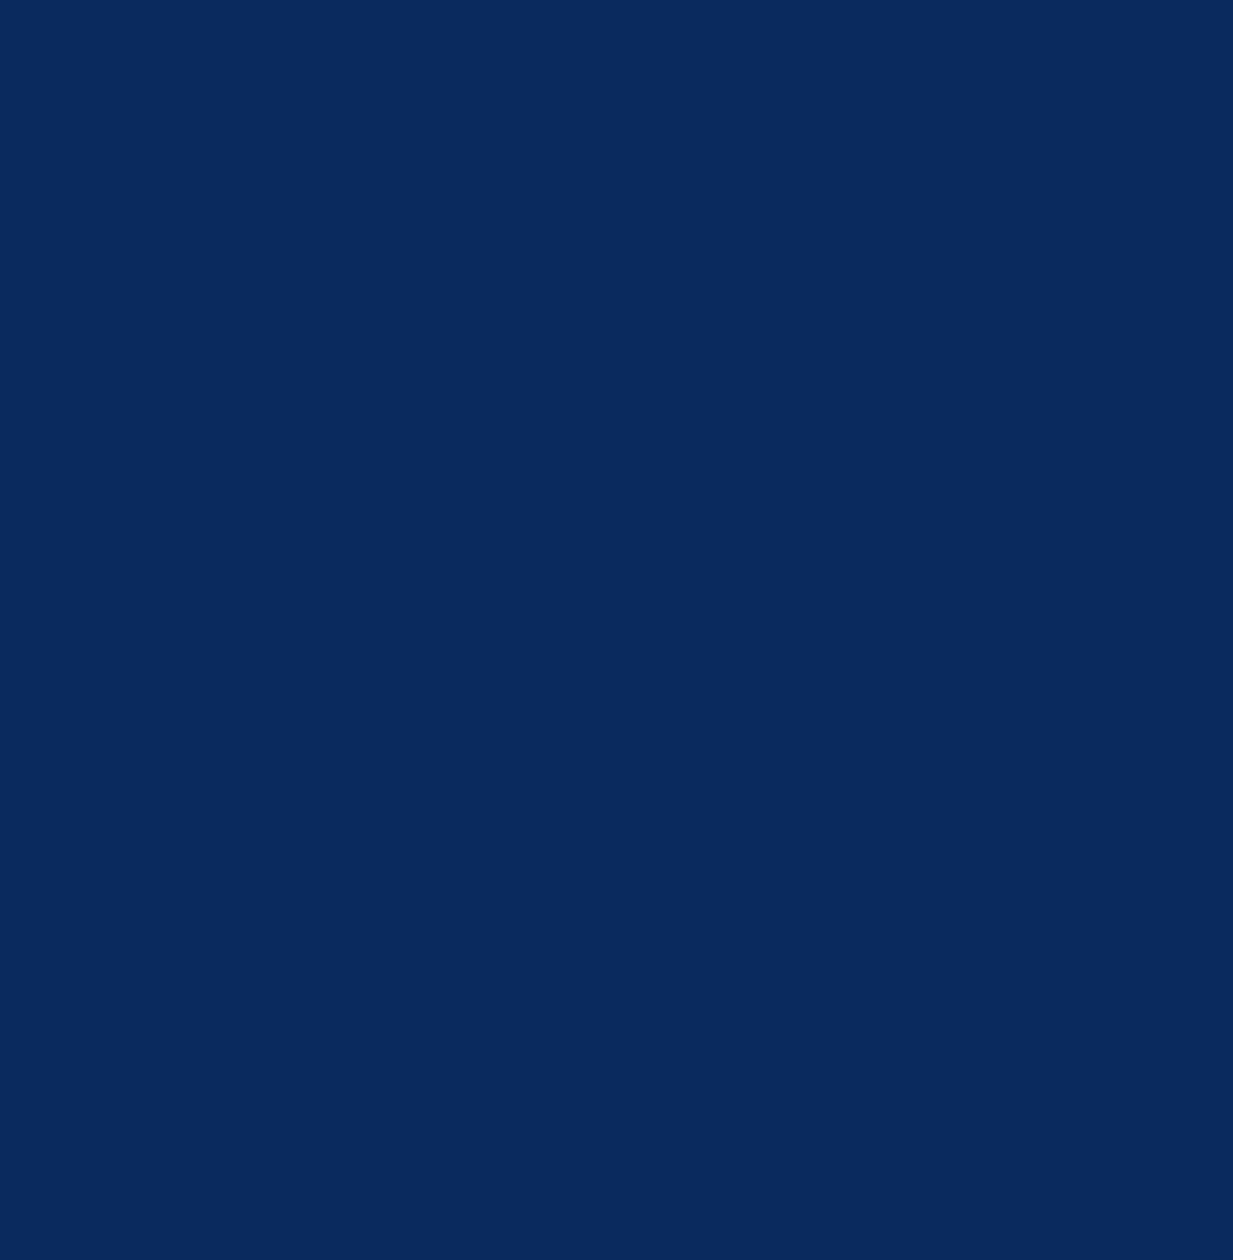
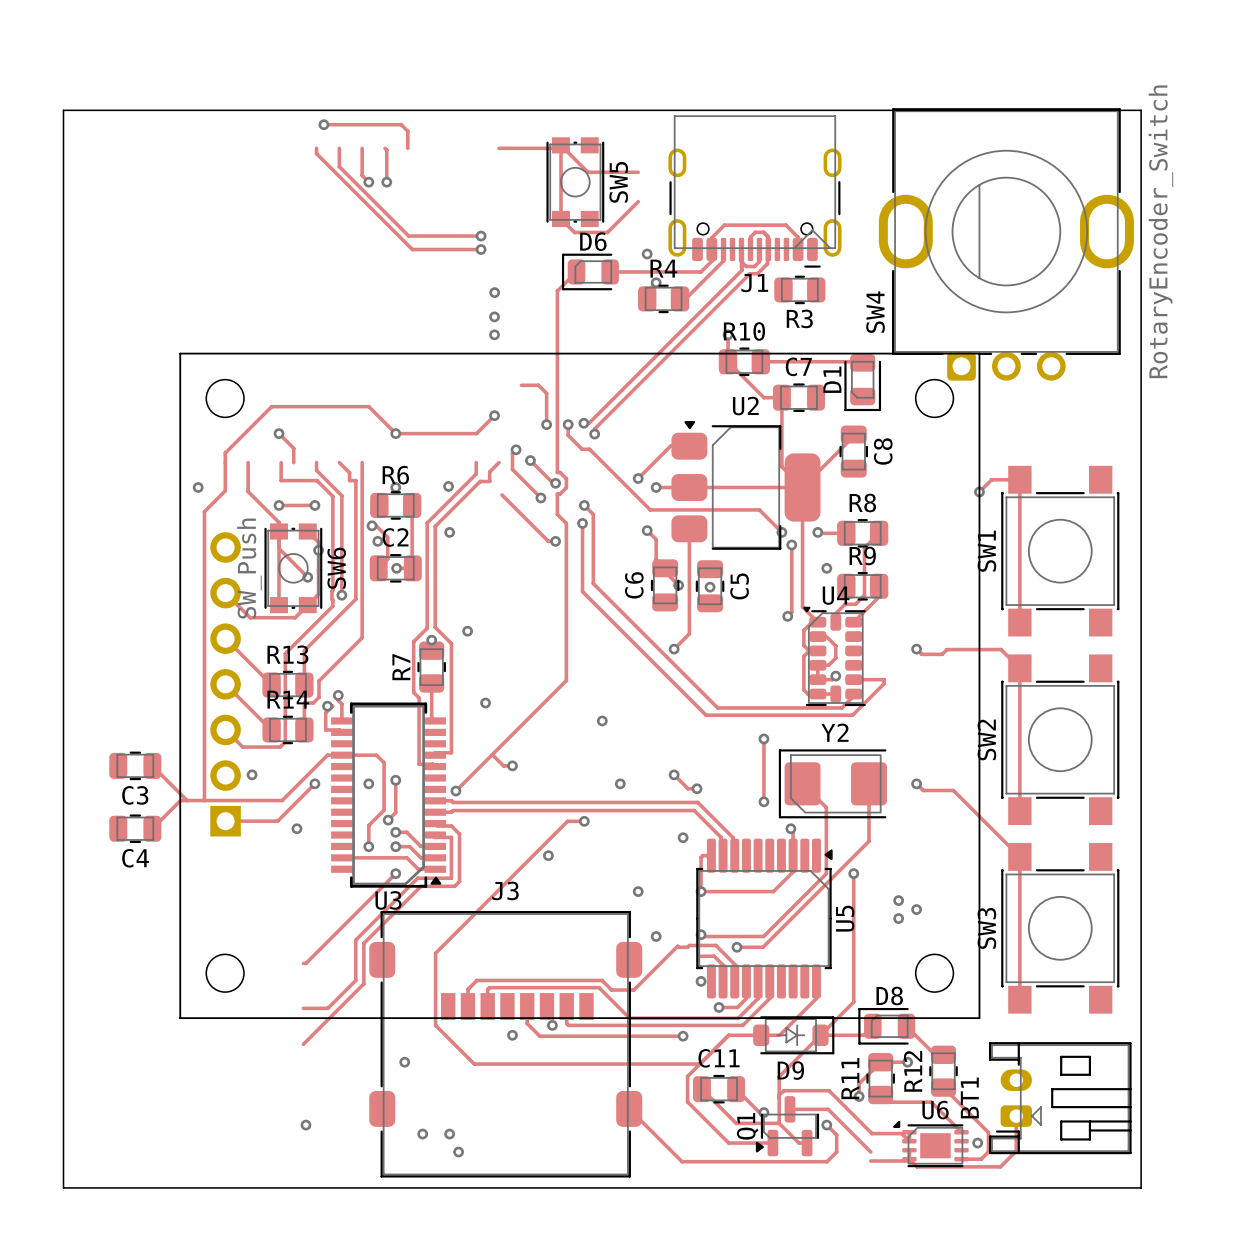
board edge: none -> (63, 110) (1141, 110) (1141, 1187) (63, 1187) (63, 110)
track: none -> (323, 124) (401, 124) (407, 131) (407, 148)
via: none -> (323, 124)
track: none -> (560, 145) (558, 148) (499, 148)
track: none -> (560, 145) (587, 172) (638, 172)
track: none -> (560, 145) (560, 218) (574, 232) (607, 232) (638, 201)
track: none -> (316, 148) (316, 153) (412, 249) (481, 249)
track: none -> (339, 148) (339, 166) (408, 236) (481, 236)
track: none -> (362, 148) (362, 175) (368, 182)
track: none -> (384, 148) (386, 150) (386, 182)
via: none -> (368, 182)
via: none -> (386, 182)
SW5: none -> (575, 182)
J1: none -> (754, 191)
via: none -> (481, 236)
track: none -> (767, 236) (767, 263) (757, 273) (749, 273) (594, 428) (594, 434)
SW4: none -> RotaryEncoder_Switch (1006, 244)
via: none -> (481, 249)
track: none -> (723, 249) (723, 260) (685, 298) (679, 298)
track: none -> (741, 249) (741, 270) (588, 423) (583, 423)
track: none -> (750, 249) (750, 237) (755, 232) (763, 232) (768, 237) (768, 249)
track: none -> (759, 249) (759, 261) (754, 266) (746, 266) (741, 261)
track: none -> (798, 249) (798, 237) (785, 225) (724, 225) (711, 237) (711, 261) (700, 271) (610, 271)
via: none -> (647, 254)
track: none -> (576, 271) (557, 291) (557, 472) (560, 472) (566, 478) (566, 487) (560, 494) (557, 494) (557, 514) (566, 523) (566, 680) (455, 791)
D6: none -> (590, 271)
via: none -> (656, 282)
R3: none -> (799, 289)
via: none -> (494, 292)
R4: none -> (663, 298)
via: none -> (494, 316)
via: none -> (494, 334)
track: none -> (728, 334) (728, 361) (763, 397) (781, 397) (781, 466) (802, 487)
via: none -> (728, 334)
R10: none -> (744, 361)
track: none -> (760, 361) (862, 362)
D1: none -> (862, 382)
track: none -> (521, 385) (538, 385) (546, 393) (546, 424)
C7: none -> (798, 397)
track: none -> (494, 415) (476, 433) (395, 433) (368, 406) (271, 406) (225, 453) (225, 490) (204, 511) (204, 800)
via: none -> (494, 415)
via: none -> (583, 423)
via: none -> (546, 424)
track: none -> (568, 424) (568, 435) (582, 449) (589, 449) (650, 509) (759, 509) (781, 532)
via: none -> (568, 424)
track: none -> (279, 433) (293, 448) (293, 462)
via: none -> (279, 433)
via: none -> (395, 433)
via: none -> (594, 434)
track: none -> (853, 434) (802, 487)
track: none -> (689, 446) (670, 446) (638, 478)
track: none -> (516, 449) (512, 453) (512, 469) (540, 497)
via: none -> (516, 449)
C8: none -> (853, 451)
track: none -> (530, 460) (553, 483) (555, 483)
via: none -> (530, 460)
track: none -> (248, 462) (248, 491) (279, 522) (279, 596)
track: none -> (281, 462) (281, 480) (317, 480) (332, 496) (332, 606) (285, 653) (285, 741) (280, 747) (242, 747) (225, 729)
track: none -> (316, 462) (316, 470) (341, 495) (341, 595)
track: none -> (339, 462) (349, 472) (349, 480) (355, 480) (355, 599) (304, 650) (304, 685)
track: none -> (362, 462) (362, 637) (318, 681) (318, 697) (313, 703) (304, 703) (304, 729)
track: none -> (476, 462) (476, 474) (427, 523) (427, 628) (413, 641) (413, 692) (419, 697) (419, 764) (432, 764) (435, 766)
track: none -> (499, 462) (489, 471) (489, 481) (480, 481) (435, 526) (435, 627) (451, 643) (451, 752) (435, 752) (435, 755)
via: none -> (638, 478)
track: none -> (1019, 479) (1019, 622)
track: none -> (1019, 479) (991, 479) (979, 491)
via: none -> (555, 483)
U2: none -> (745, 485)
via: none -> (448, 486)
via: none -> (198, 487)
via: none -> (395, 487)
track: none -> (656, 487) (802, 487)
via: none -> (656, 487)
track: none -> (802, 487) (802, 606) (817, 622) (812, 622) (803, 630) (803, 645) (809, 650)
via: none -> (979, 491)
track: none -> (502, 494) (548, 541) (555, 541)
via: none -> (540, 497)
track: none -> (279, 505) (314, 505)
via: none -> (279, 505)
via: none -> (314, 505)
R6: none -> (395, 505)
track: none -> (412, 505) (412, 568) (396, 568)
track: none -> (584, 505) (593, 514) (593, 583) (717, 707) (841, 707) (853, 694)
via: none -> (584, 505)
track: none -> (582, 523) (582, 591) (706, 715) (852, 715) (884, 683) (884, 679) (853, 679)
via: none -> (582, 523)
track: none -> (372, 525) (376, 525) (387, 537) (387, 559) (378, 568)
via: none -> (372, 525)
track: none -> (689, 528) (689, 633) (674, 649)
track: none -> (647, 530) (656, 539) (656, 559) (678, 585)
via: none -> (647, 530)
track: none -> (307, 531) (318, 542) (318, 594) (295, 617) (250, 617) (225, 593)
via: none -> (449, 532)
via: none -> (781, 532)
track: none -> (817, 532) (846, 533)
via: none -> (817, 532)
R8: none -> (862, 533)
track: none -> (879, 533) (864, 547) (864, 595) (855, 604) (845, 604) (835, 613) (835, 622)
via: none -> (377, 541)
via: none -> (555, 541)
track: none -> (791, 544) (791, 612) (787, 616)
via: none -> (791, 544)
track: none -> (279, 548) (307, 577)
via: none -> (318, 550)
SW1: none -> (1060, 551)
SW6: none -> SW_Push (293, 568)
C2: none -> (395, 568)
via: none -> (396, 568)
via: none -> (826, 568)
via: none -> (307, 577)
C6: none -> (665, 585)
via: none -> (678, 585)
C5: none -> (710, 586)
R9: none -> (862, 586)
track: none -> (879, 586) (879, 596) (853, 622)
via: none -> (710, 587)
via: none -> (341, 595)
via: none -> (787, 616)
via: none -> (467, 631)
track: none -> (826, 636) (835, 645) (835, 658) (828, 665) (817, 665) (817, 679) (832, 679) (835, 676)
track: none -> (225, 638) (271, 684)
via: none -> (431, 640)
via: none -> (674, 649)
track: none -> (916, 649) (921, 654) (942, 654) (946, 649) (1001, 649) (1019, 668) (1019, 811)
via: none -> (916, 649)
track: none -> (809, 650) (803, 656) (803, 690) (807, 694) (835, 694)
U4: none -> (834, 656)
R7: none -> (431, 667)
via: none -> (835, 676)
track: none -> (431, 683) (431, 717) (435, 720)
track: none -> (225, 684) (271, 729)
R13: none -> (287, 685)
part: none -> (579, 685)
track: none -> (338, 695) (338, 700) (341, 704) (341, 720)
via: none -> (338, 695)
via: none -> (485, 703)
track: none -> (327, 706) (332, 706) (325, 713) (325, 729) (339, 729) (341, 732)
via: none -> (327, 706)
via: none -> (602, 720)
R14: none -> (287, 729)
track: none -> (763, 738) (763, 801)
via: none -> (763, 738)
SW2: none -> (1060, 739)
track: none -> (492, 754) (503, 765) (512, 765)
C3: none -> (135, 765)
track: none -> (152, 765) (187, 800)
via: none -> (512, 765)
via: none -> (252, 774)
track: none -> (674, 774) (688, 788) (697, 788)
via: none -> (674, 774)
track: none -> (395, 780) (395, 812) (388, 820)
via: none -> (395, 780)
track: none -> (314, 783) (277, 821) (225, 821)
via: none -> (314, 783)
via: none -> (368, 783)
via: none -> (620, 783)
track: none -> (802, 783) (826, 807) (826, 873) (763, 936) (702, 936) (701, 934)
Y2: none -> (832, 783)
track: none -> (869, 783) (869, 841) (763, 947) (737, 947)
track: none -> (916, 783) (923, 790) (953, 790) (1019, 856) (1019, 999)
via: none -> (916, 783)
via: none -> (697, 788)
via: none -> (455, 791)
U3: none -> (388, 795)
track: none -> (435, 800) (453, 802) (697, 802) (732, 837) (732, 853) (734, 855)
via: none -> (763, 801)
track: none -> (435, 812) (453, 810) (694, 810) (721, 837) (721, 853) (723, 855)
via: none -> (388, 820)
track: none -> (584, 821) (567, 821) (435, 953) (435, 1025) (474, 1064) (699, 1064)
via: none -> (584, 821)
track: none -> (435, 823) (437, 826) (451, 826) (459, 834) (459, 881) (454, 886) (421, 886) (363, 943) (363, 983) (303, 1044)
C4: none -> (135, 828)
track: none -> (152, 828) (180, 800) (282, 800) (327, 755) (376, 755) (384, 762) (384, 810) (368, 825) (368, 846)
via: none -> (296, 828)
track: none -> (790, 828) (793, 830) (793, 871) (773, 891) (701, 891) (701, 857) (711, 855)
via: none -> (790, 828)
track: none -> (395, 832) (406, 832) (420, 846) (435, 846)
via: none -> (395, 832)
track: none -> (435, 835) (435, 837) (451, 837) (451, 878) (417, 878) (355, 940) (355, 980) (327, 1008) (303, 1008)
via: none -> (683, 837)
via: none -> (368, 846)
track: none -> (395, 846) (409, 846) (420, 857) (435, 857)
via: none -> (395, 846)
via: none -> (548, 855)
track: none -> (341, 857) (406, 857) (418, 869) (435, 869)
track: none -> (395, 873) (305, 963) (303, 963)
via: none -> (395, 873)
track: none -> (853, 873) (853, 1002) (779, 1076) (779, 1123)
via: none -> (853, 873)
via: none -> (638, 891)
via: none -> (701, 891)
via: none -> (898, 900)
via: none -> (916, 909)
U5: none -> (764, 918)
via: none -> (898, 918)
SW3: none -> (1060, 928)
via: none -> (701, 934)
via: none -> (656, 936)
via: none -> (737, 947)
track: none -> (701, 956) (714, 956) (723, 965) (723, 981)
via: none -> (701, 981)
track: none -> (734, 981) (734, 964) (715, 945) (677, 946) (633, 990) (611, 990) (602, 980) (476, 980) (467, 989) (467, 1006)
track: none -> (746, 981) (746, 998) (737, 1007) (719, 1007)
track: none -> (758, 981) (758, 998) (738, 1018) (629, 1018) (599, 987) (489, 987) (487, 989) (487, 1006)
track: none -> (769, 981) (769, 998) (742, 1025) (568, 1025) (566, 1023) (566, 1006)
track: none -> (816, 981) (816, 998) (779, 1035) (728, 1035) (687, 1076) (687, 1101) (728, 1143) (772, 1143)
track: none -> (527, 1006) (527, 1023) (539, 1036) (683, 1036)
via: none -> (719, 1007)
via: none -> (552, 1025)
track: none -> (872, 1026) (863, 1035) (820, 1035)
D8: none -> (886, 1026)
track: none -> (906, 1026) (935, 1054) (943, 1054)
via: none -> (512, 1035)
D9: none -> (793, 1035)
via: none -> (683, 1036)
J3: none -> (505, 1044)
via: none -> (404, 1062)
track: none -> (907, 1062) (880, 1062) (859, 1083) (859, 1096)
via: none -> (907, 1062)
R12: none -> (943, 1071)
R11: none -> (880, 1078)
track: none -> (943, 1087) (988, 1132) (988, 1152) (981, 1159) (961, 1159)
track: none -> (701, 1089) (736, 1123) (779, 1123)
C11: none -> (719, 1089)
track: none -> (736, 1089) (759, 1112) (763, 1112)
track: none -> (779, 1095) (783, 1090) (829, 1090) (871, 1133) (901, 1133) (909, 1141) (909, 1132)
track: none -> (880, 1095) (887, 1102) (931, 1102) (961, 1132)
via: none -> (859, 1096)
BT1: none -> (1060, 1098)
track: none -> (629, 1108) (682, 1161) (827, 1161) (836, 1152) (836, 1134) (826, 1125)
track: none -> (789, 1109) (828, 1109) (870, 1152)
via: none -> (763, 1112)
track: none -> (1016, 1116) (1016, 1151) (1000, 1166) (917, 1166) (909, 1159) (909, 1150)
track: none -> (779, 1123) (798, 1143) (807, 1143)
via: none -> (305, 1125)
via: none -> (826, 1125)
Q1: none -> (787, 1126)
via: none -> (422, 1134)
via: none -> (449, 1134)
U6: none -> (930, 1143)
via: none -> (977, 1143)
via: none -> (458, 1152)
track: none -> (870, 1161) (909, 1161)

